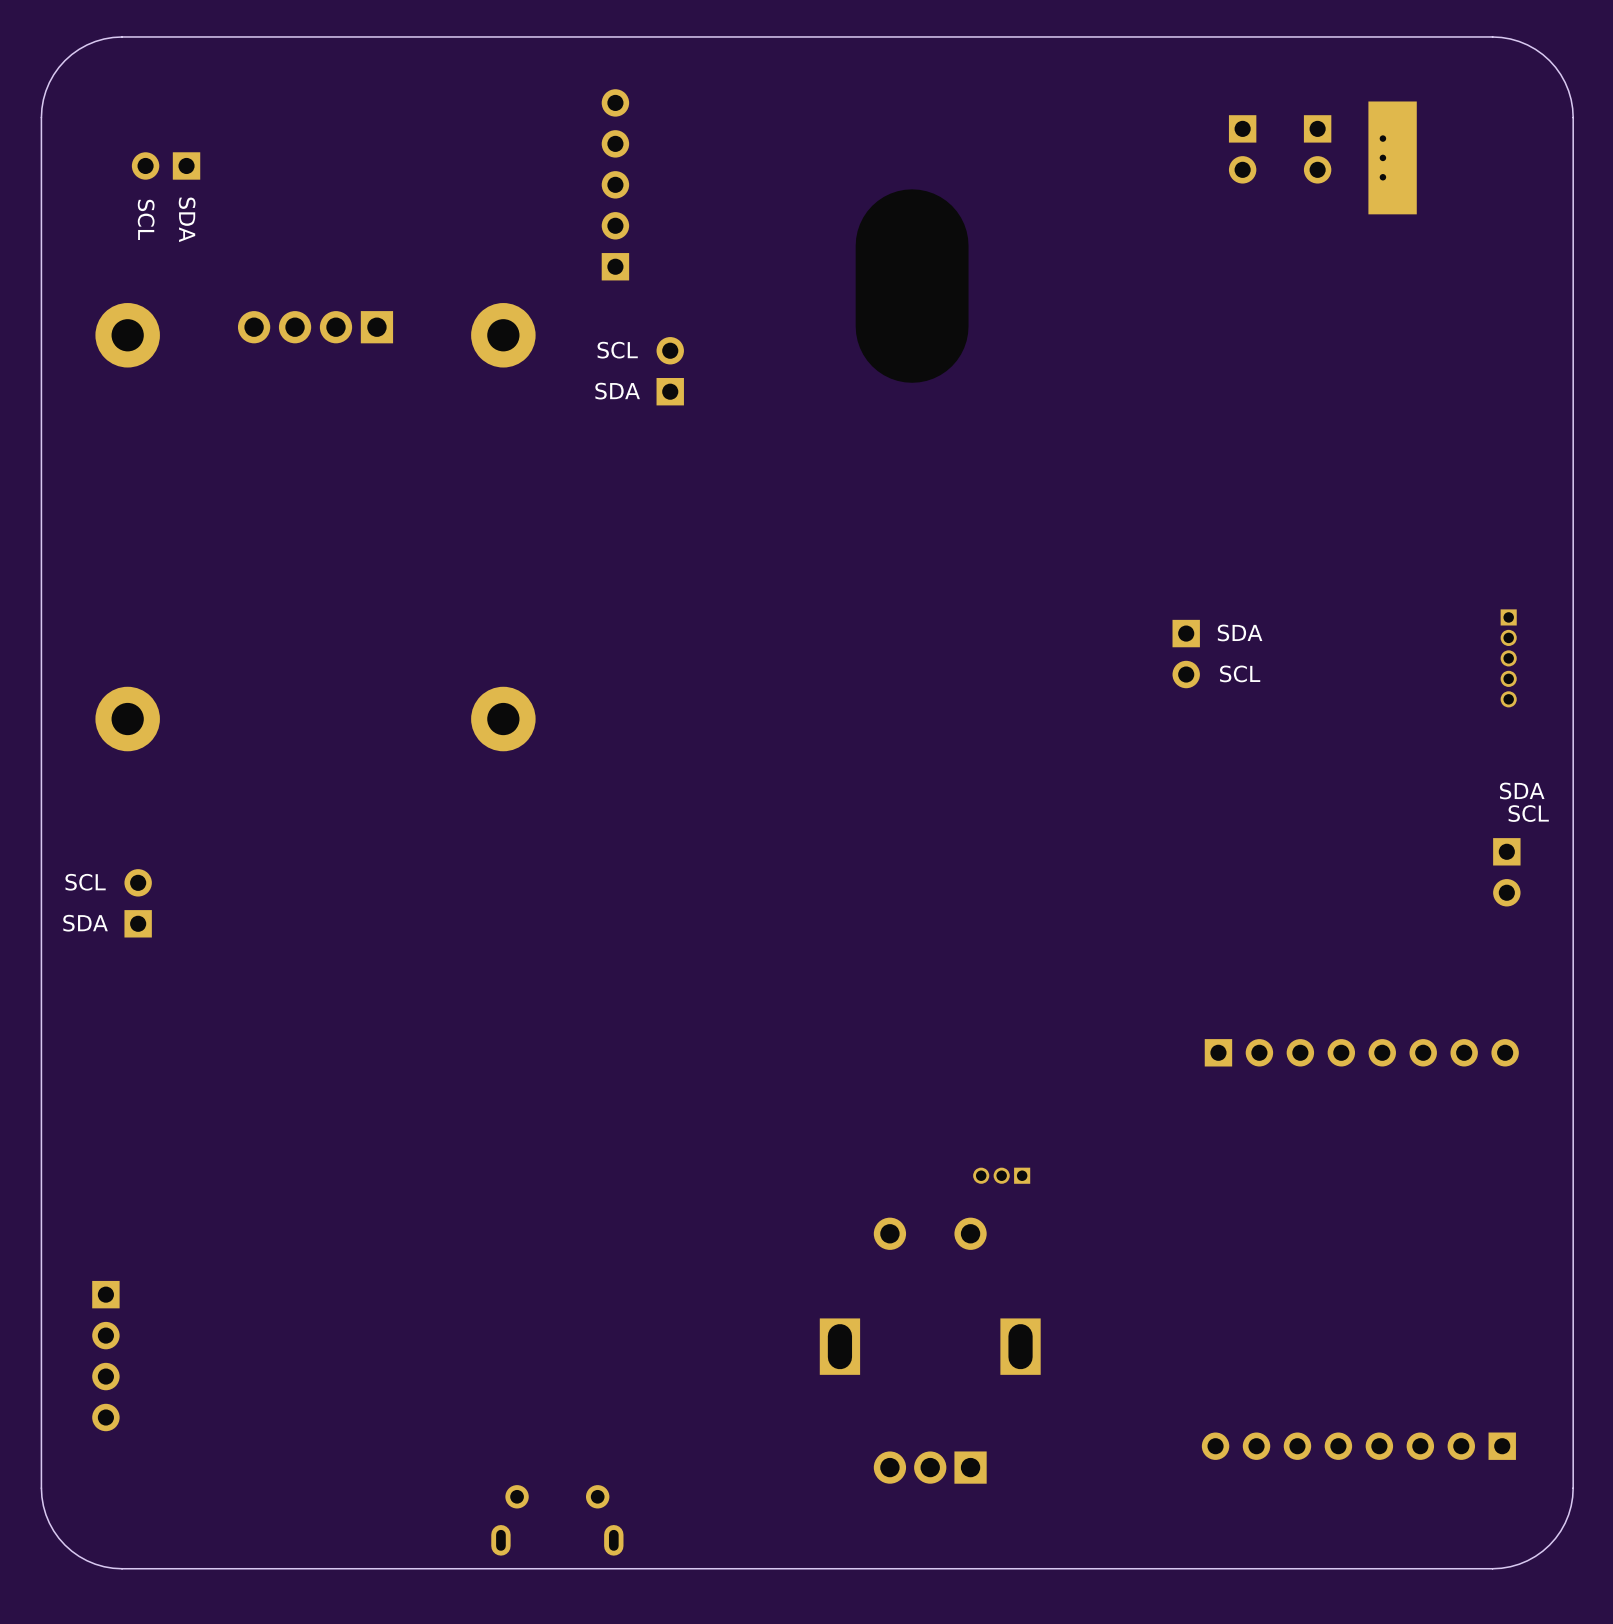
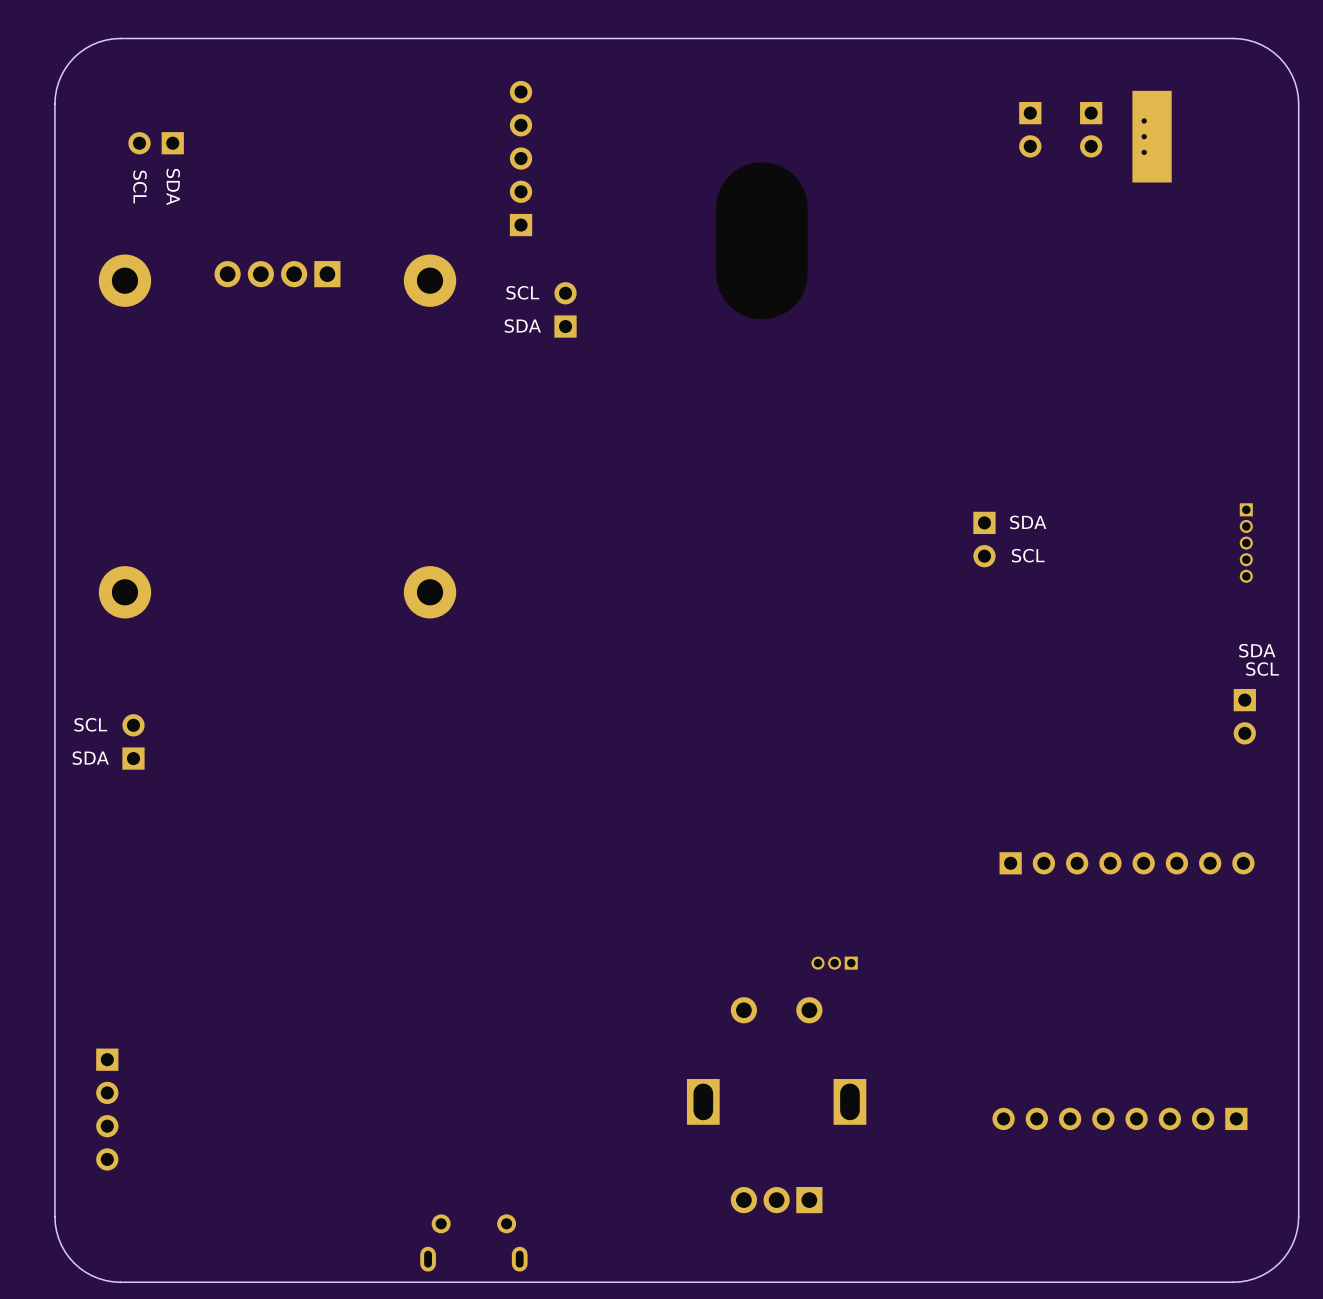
part position: (1358, 1446) -> (1119, 1118)

